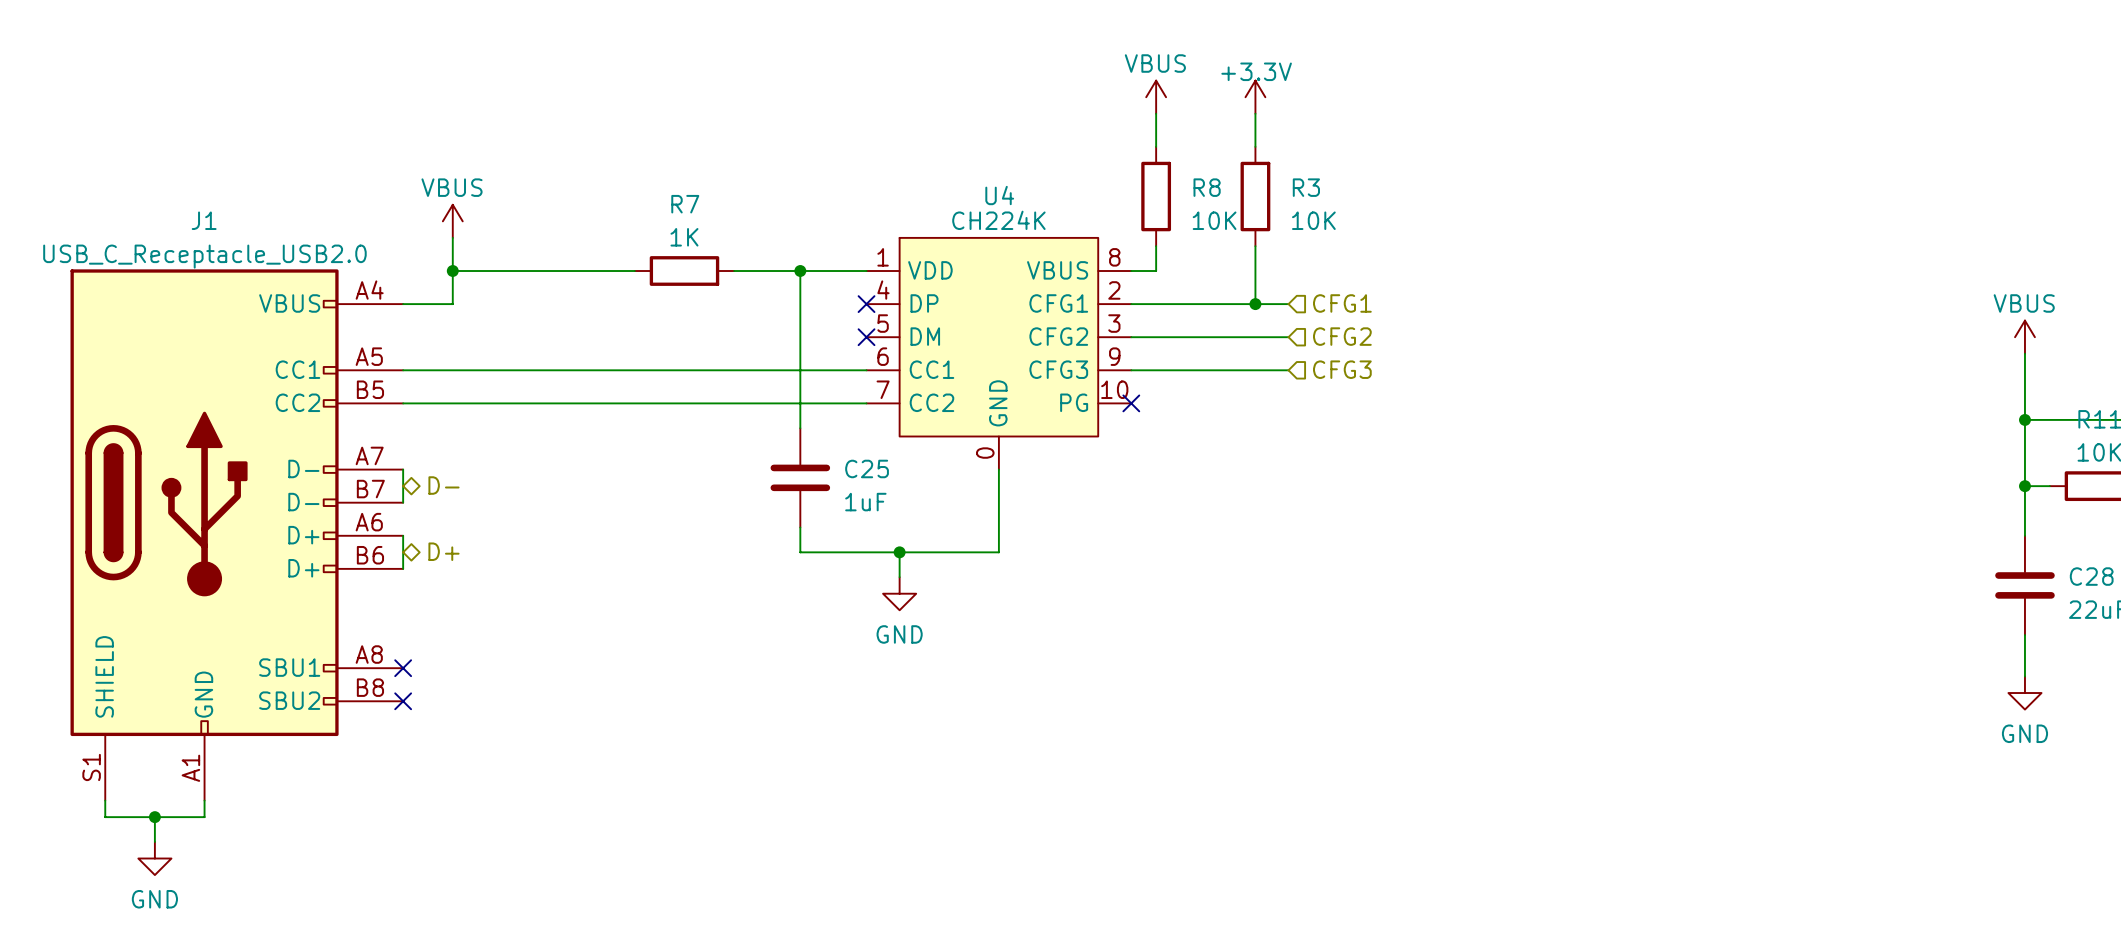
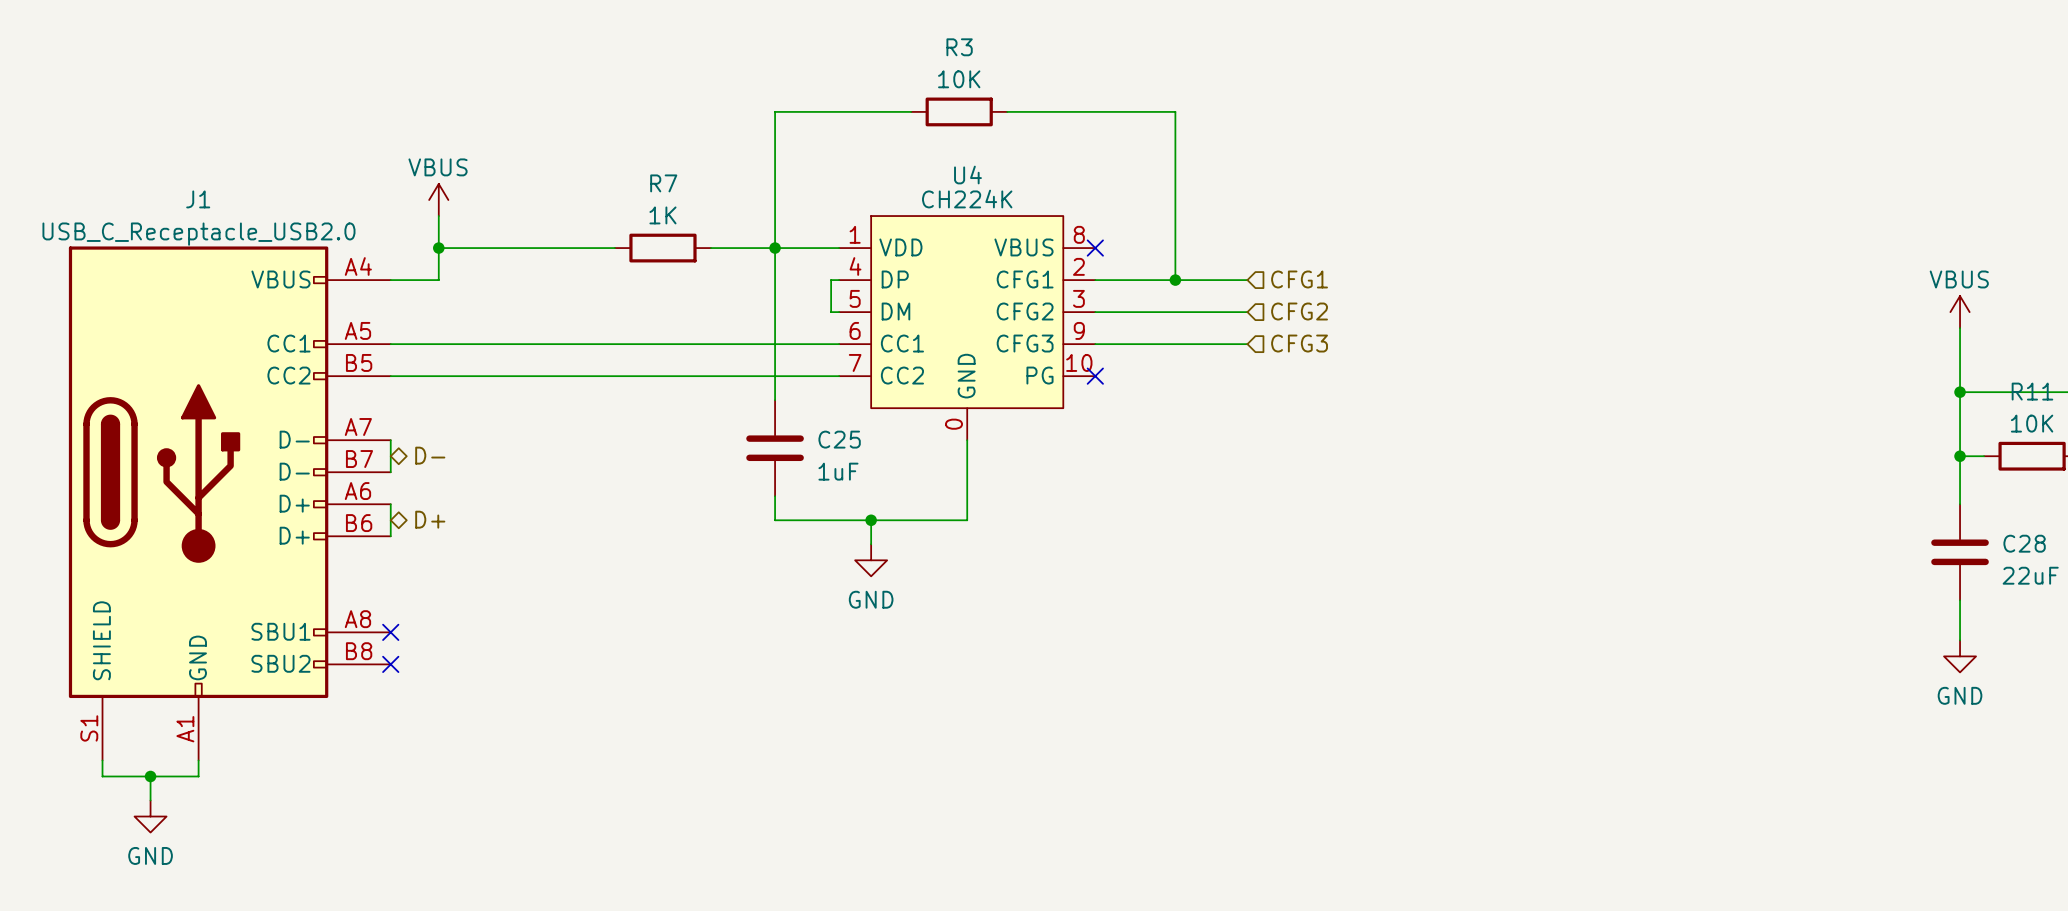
power symbol: VBUS (1156, 97) -> none
power symbol: +3.3V (1255, 97) -> none
wire: (1156, 113) (1156, 146) -> none
wire: (1255, 113) (1255, 146) -> none
wire: none -> (911, 111) (775, 111) (775, 248)
wire: none -> (1007, 111) (1175, 111) (1175, 280)
R3 name position: R3 (1306, 187) -> R3 (959, 47)
R8: 10K (1156, 196) -> none
R3 rotation: 0° (1255, 196) -> 90° clockwise (959, 111)
R3 position: (1255, 196) -> (959, 111)
R3 value position: 10K (1313, 220) -> 10K (959, 79)
wire: (1156, 246) (1156, 271) (1131, 271) -> none
wire: (1255, 246) (1255, 304) -> none
no-connect mark: none -> (1095, 248)
wire: none -> (839, 280) (831, 280) (831, 312) (839, 312)
no-connect mark: (866, 304) -> none
junction position: (1255, 304) -> (1175, 280)
no-connect mark: (866, 337) -> none

